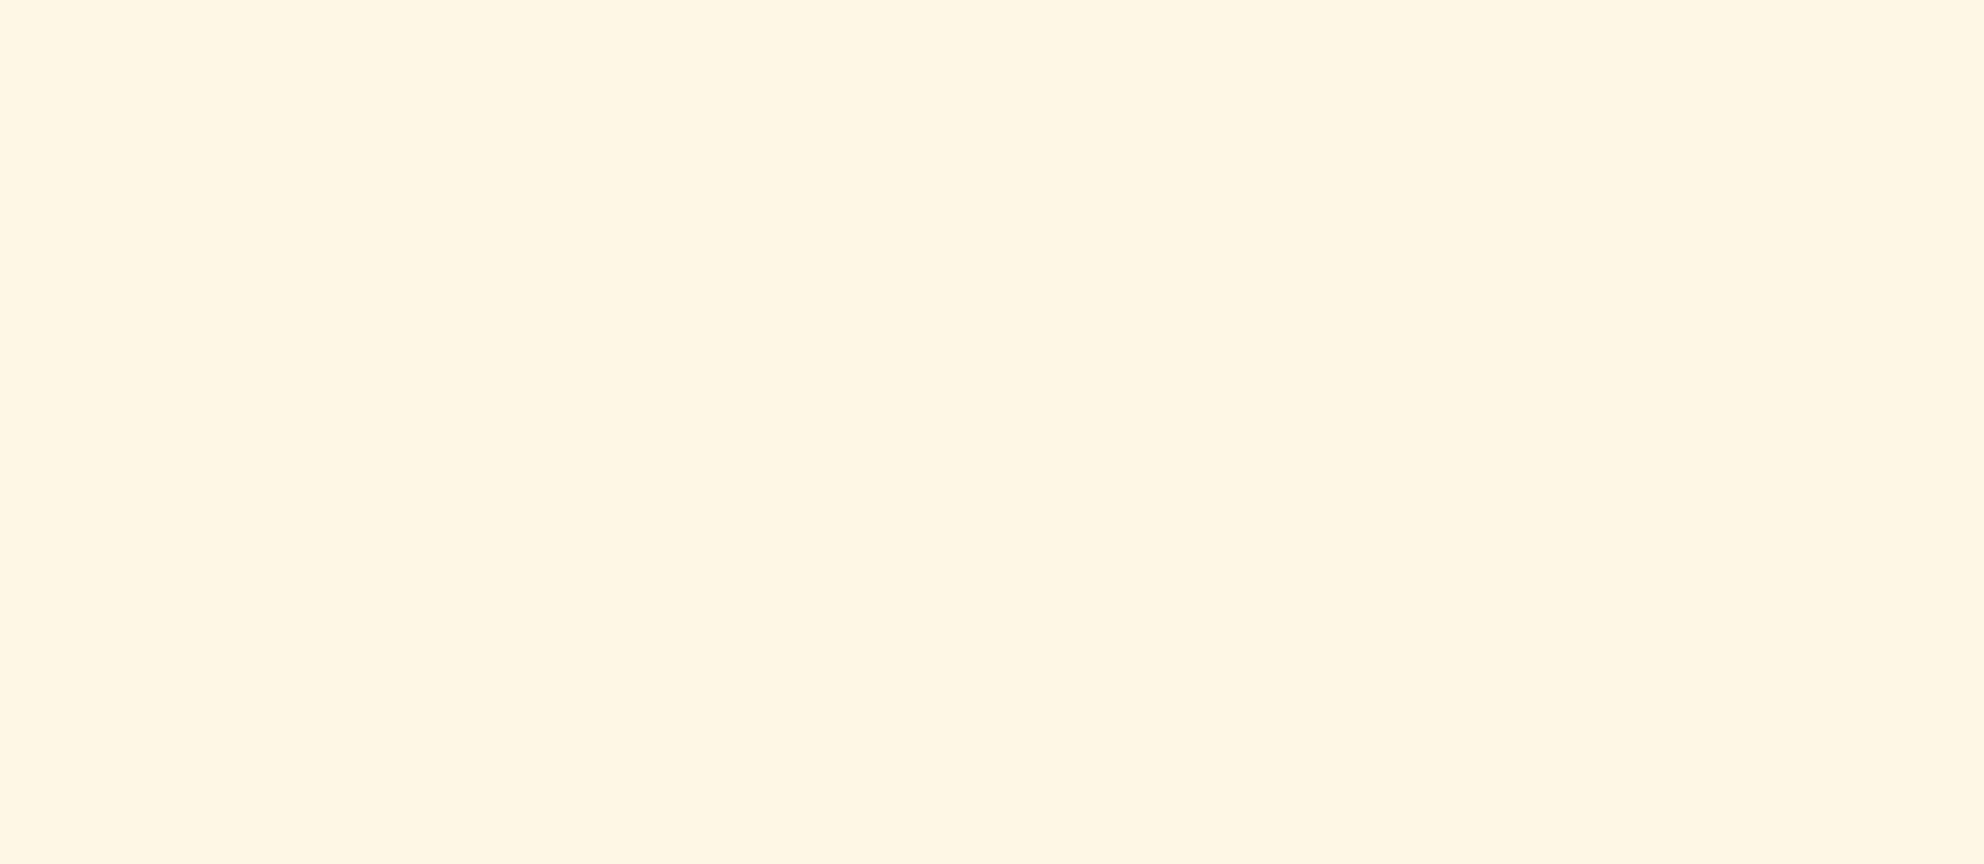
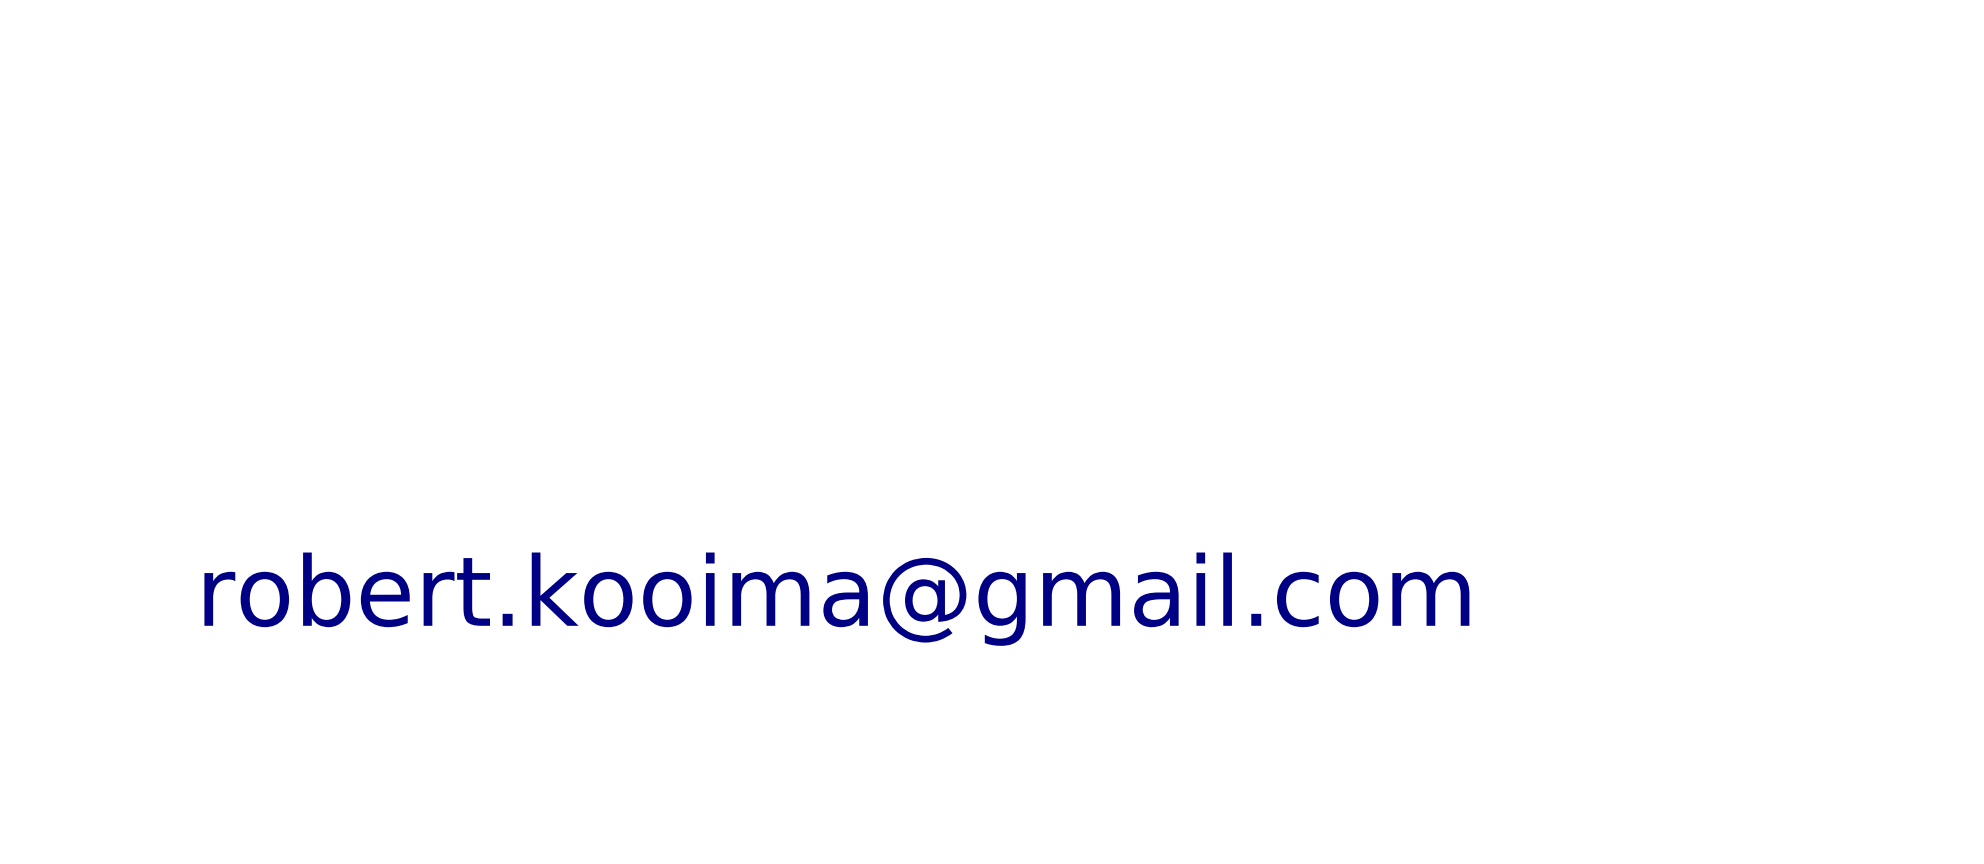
text: none -> robert.kooima@gmail.com (836, 599)

